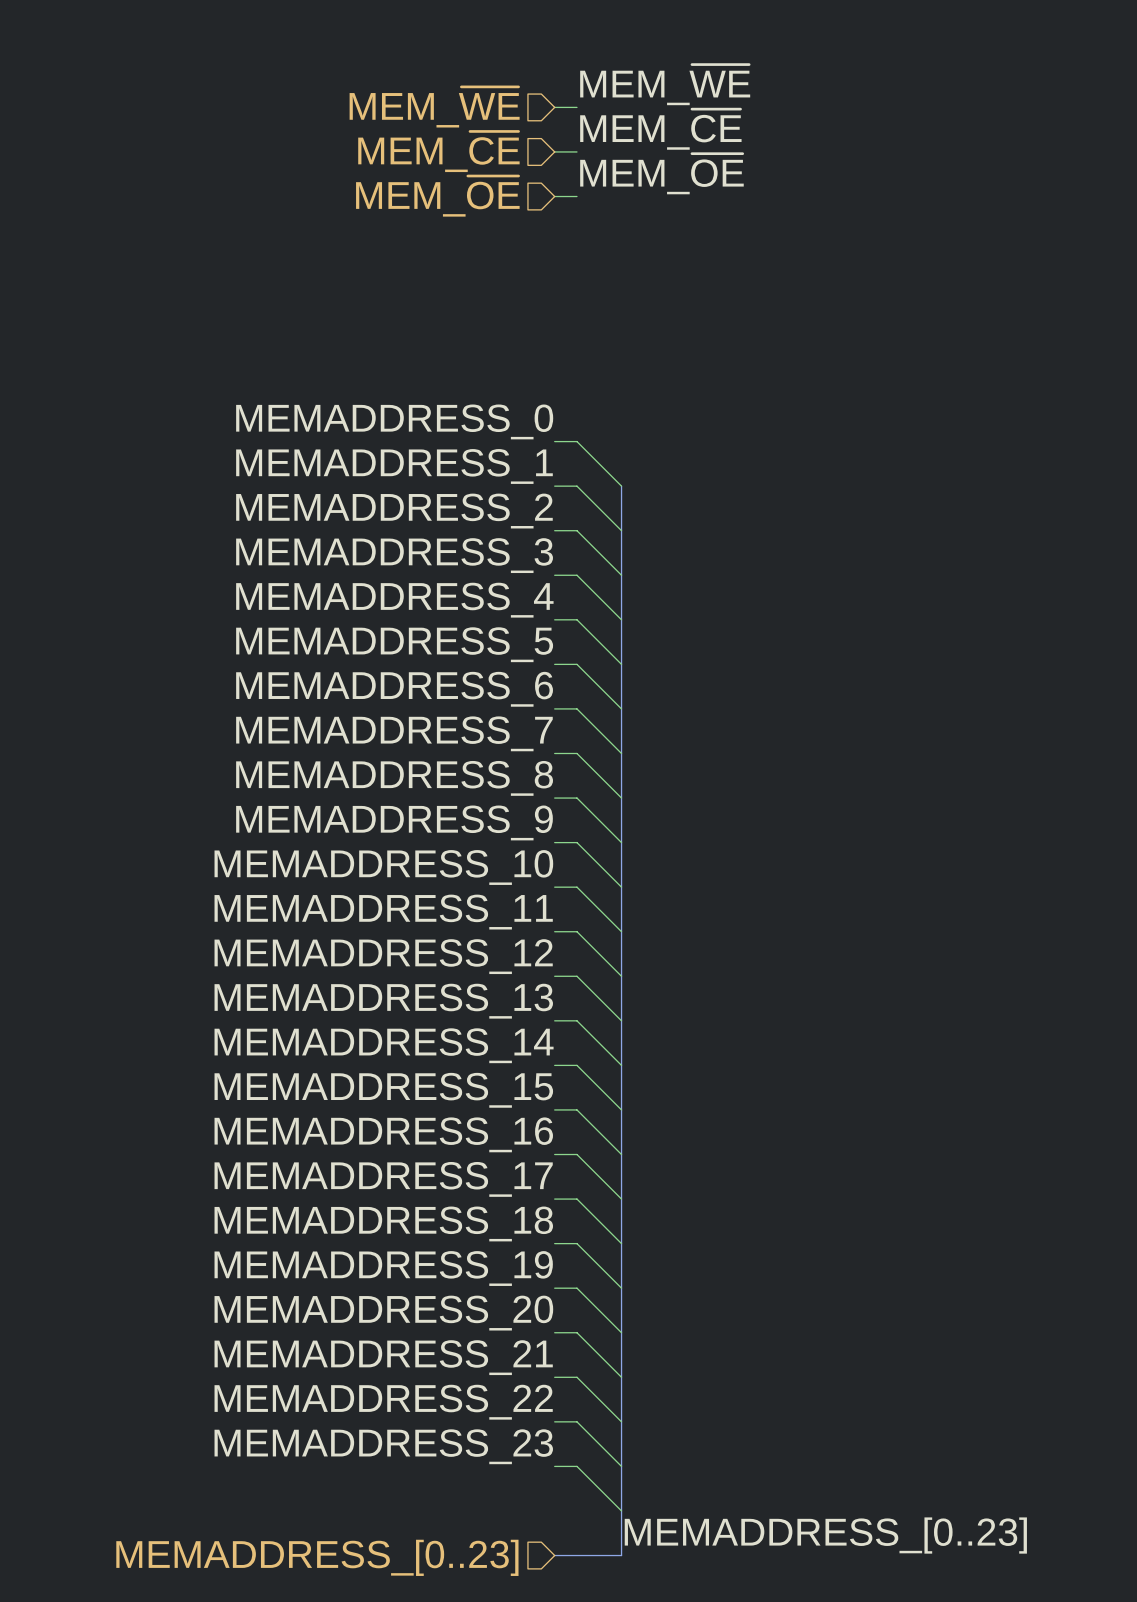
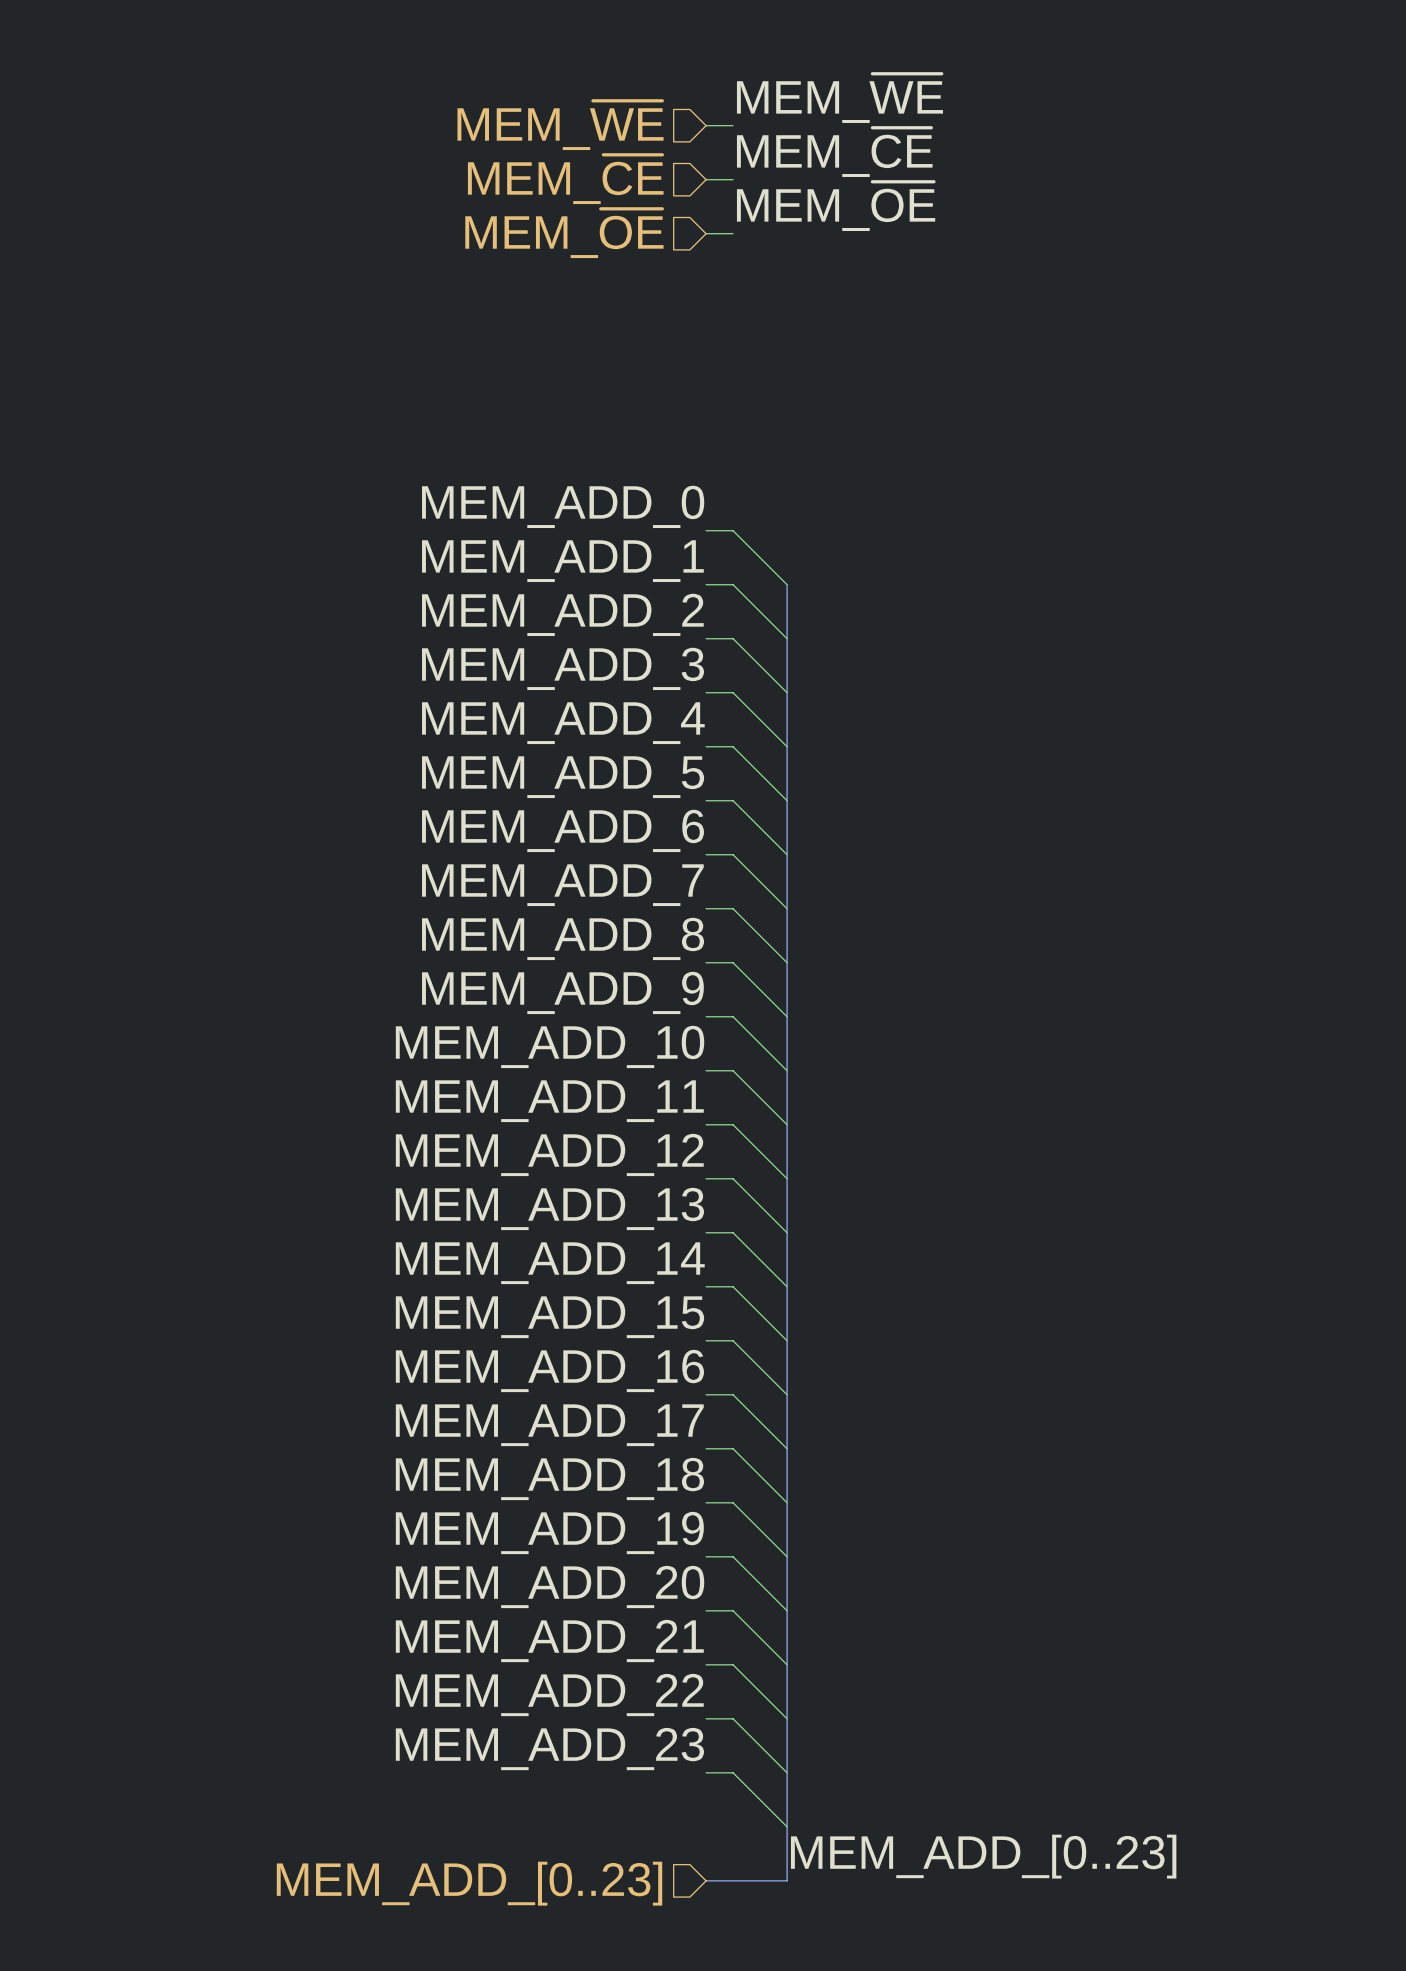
label: MEMADDRESS_0 (394, 421) -> MEM_ADD_0 (563, 506)
label: MEMADDRESS_1 (394, 466) -> MEM_ADD_1 (562, 561)
label: MEMADDRESS_2 (394, 511) -> MEM_ADD_2 (562, 614)
label: MEMADDRESS_3 (394, 555) -> MEM_ADD_3 (563, 668)
label: MEMADDRESS_4 (394, 600) -> MEM_ADD_4 (563, 723)
label: MEMADDRESS_5 (394, 644) -> MEM_ADD_5 (563, 777)
label: MEMADDRESS_6 (394, 689) -> MEM_ADD_6 (563, 830)
label: MEMADDRESS_7 (394, 733) -> MEM_ADD_7 (562, 885)
label: MEMADDRESS_8 (394, 778) -> MEM_ADD_8 (563, 938)
label: MEMADDRESS_9 (394, 822) -> MEM_ADD_9 (562, 992)
label: MEMADDRESS_10 (383, 867) -> MEM_ADD_10 (550, 1046)
label: MEMADDRESS_11 (383, 912) -> MEM_ADD_11 (549, 1101)
label: MEMADDRESS_12 (383, 956) -> MEM_ADD_12 (549, 1154)
label: MEMADDRESS_13 (383, 1001) -> MEM_ADD_13 (549, 1208)
label: MEMADDRESS_14 (384, 1045) -> MEM_ADD_14 (550, 1263)
label: MEMADDRESS_15 (383, 1090) -> MEM_ADD_15 (549, 1317)
label: MEMADDRESS_16 (383, 1134) -> MEM_ADD_16 (549, 1370)
label: MEMADDRESS_17 (383, 1179) -> MEM_ADD_17 (549, 1425)
label: MEMADDRESS_18 (383, 1223) -> MEM_ADD_18 (549, 1478)
label: MEMADDRESS_19 (383, 1268) -> MEM_ADD_19 (549, 1532)
label: MEMADDRESS_20 (383, 1313) -> MEM_ADD_20 (550, 1587)
label: MEMADDRESS_21 (383, 1357) -> MEM_ADD_21 (549, 1641)
label: MEMADDRESS_22 (383, 1402) -> MEM_ADD_22 (549, 1695)
label: MEMADDRESS_23 (383, 1446) -> MEM_ADD_23 (549, 1749)
label: MEMADDRESS_[0..23] (825, 1535) -> MEM_ADD_[0..23] (983, 1856)
hierarchical label: MEMADDRESS_[0..23] (317, 1557) -> MEM_ADD_[0..23] (469, 1883)

